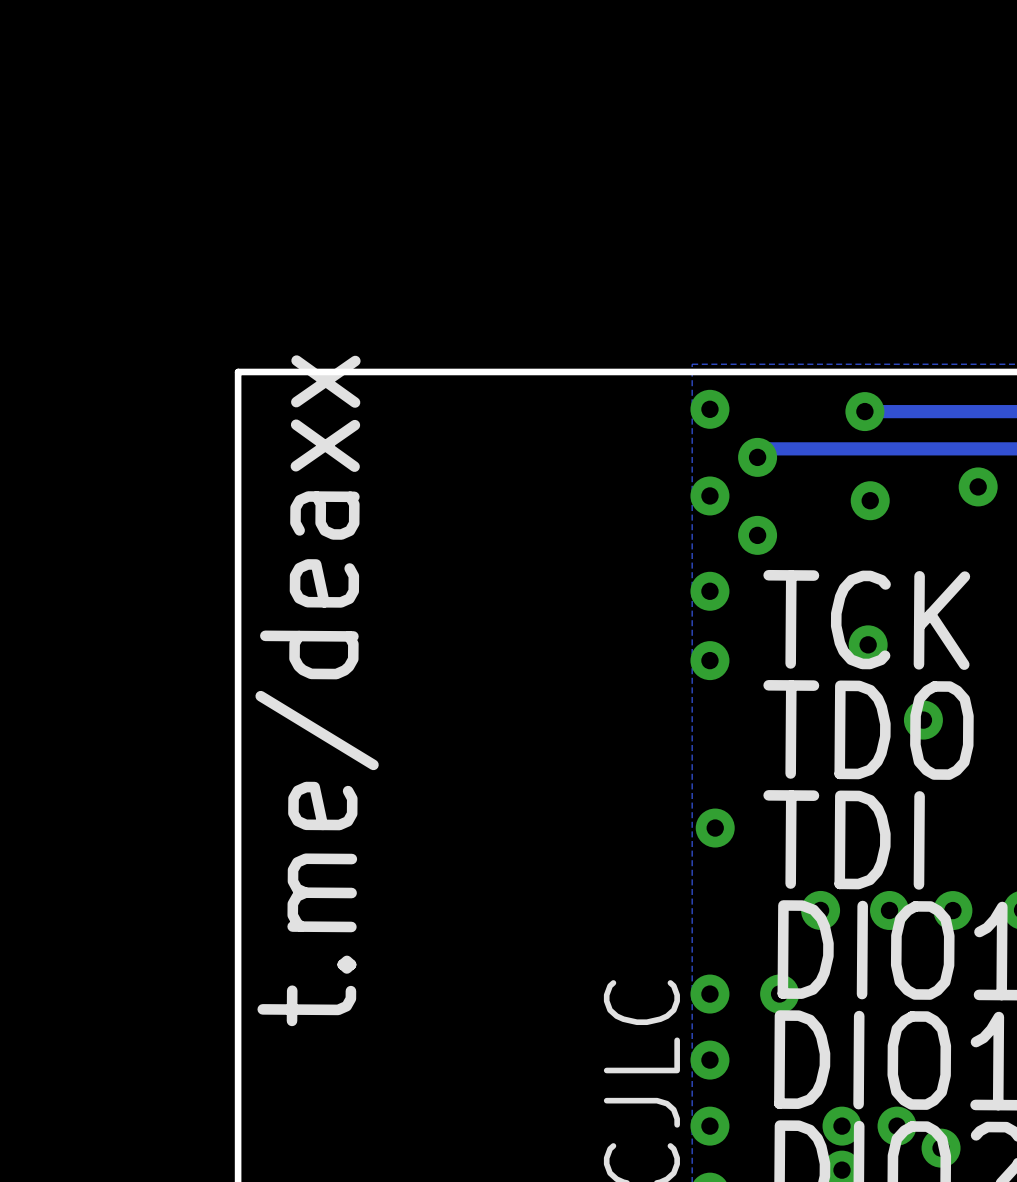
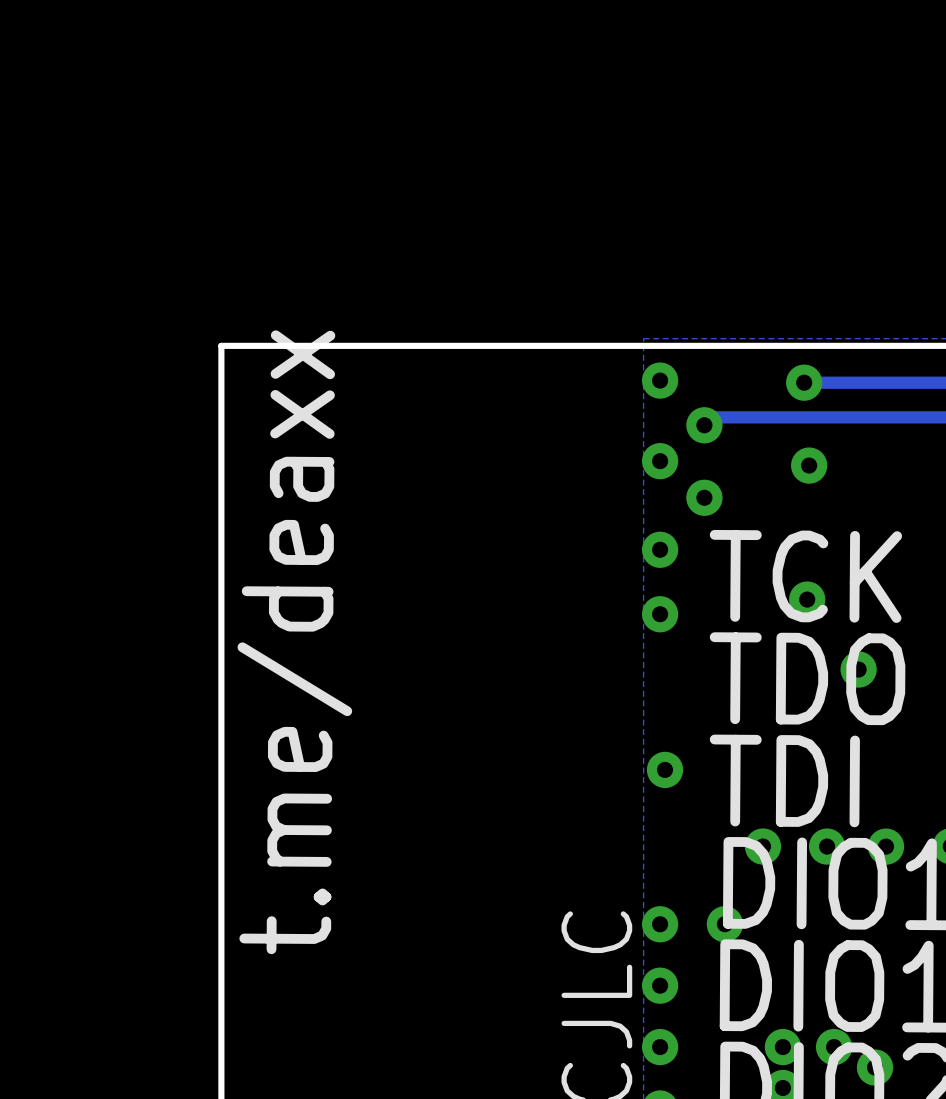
via: (978, 486) -> none

